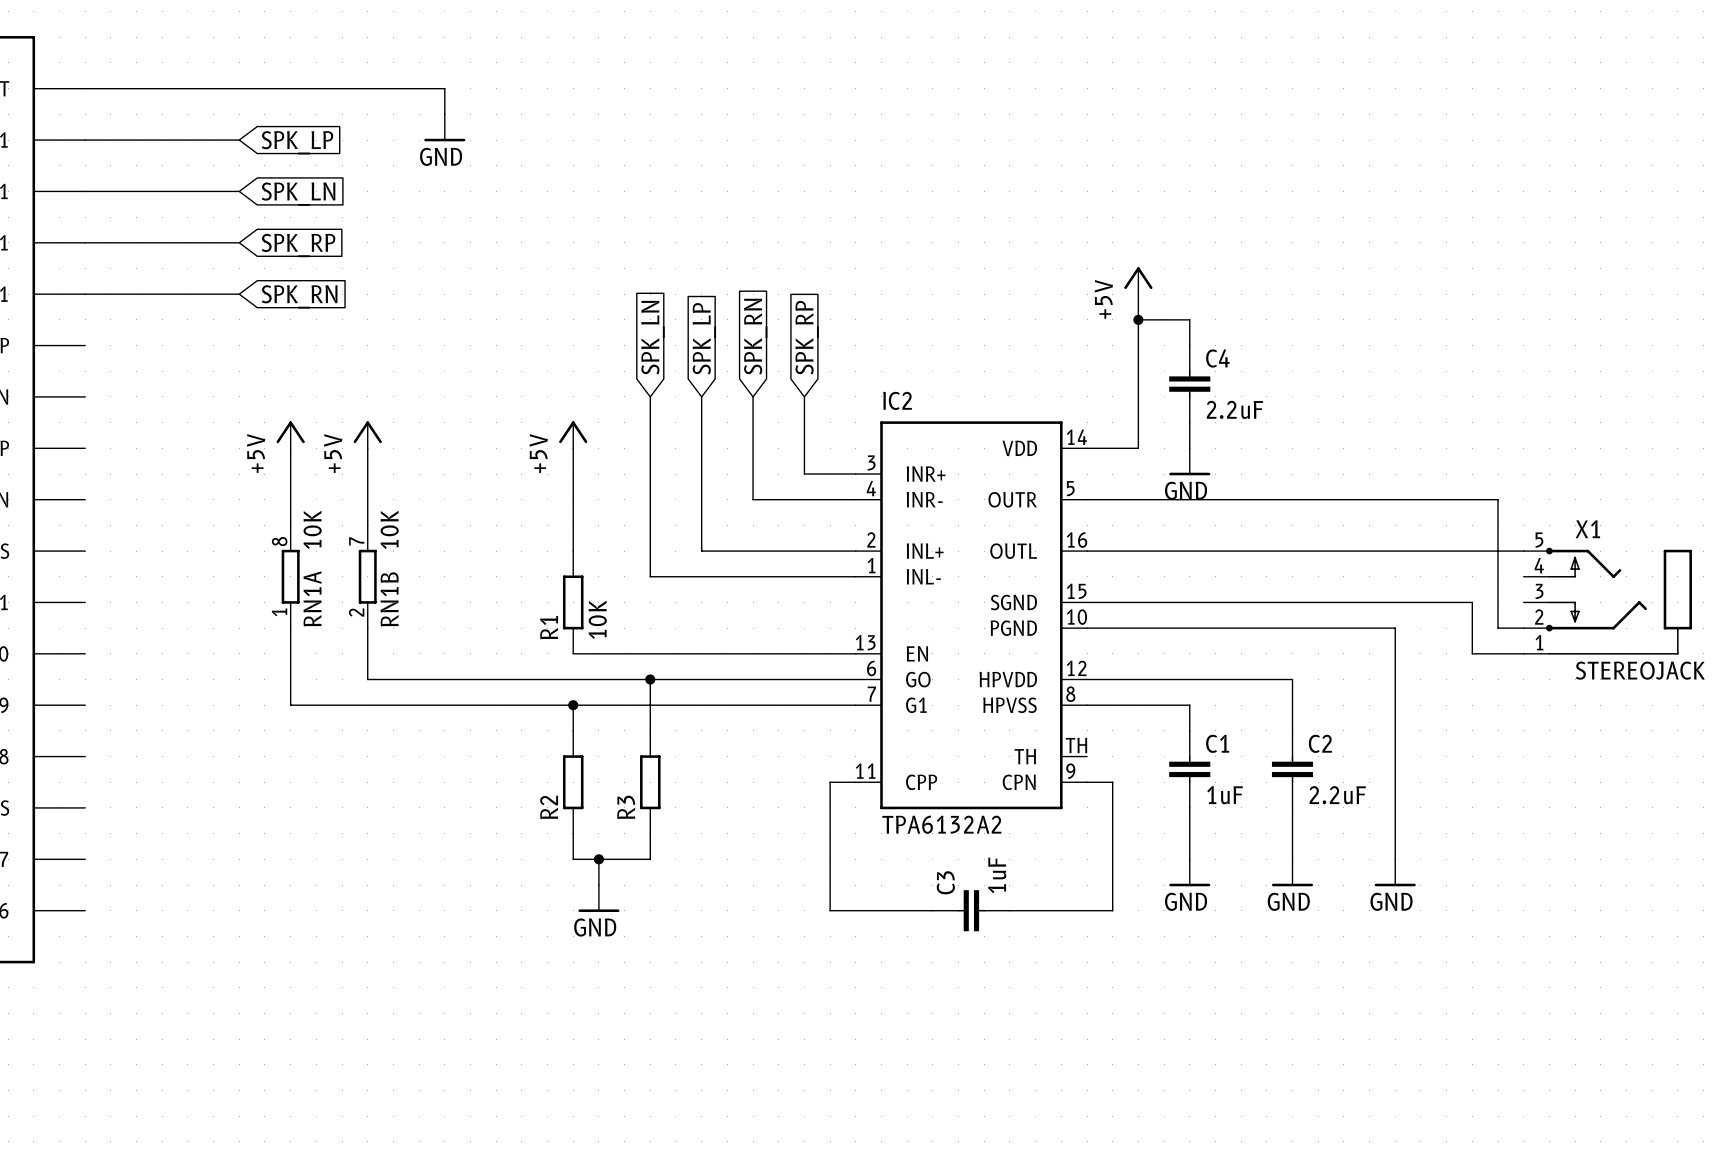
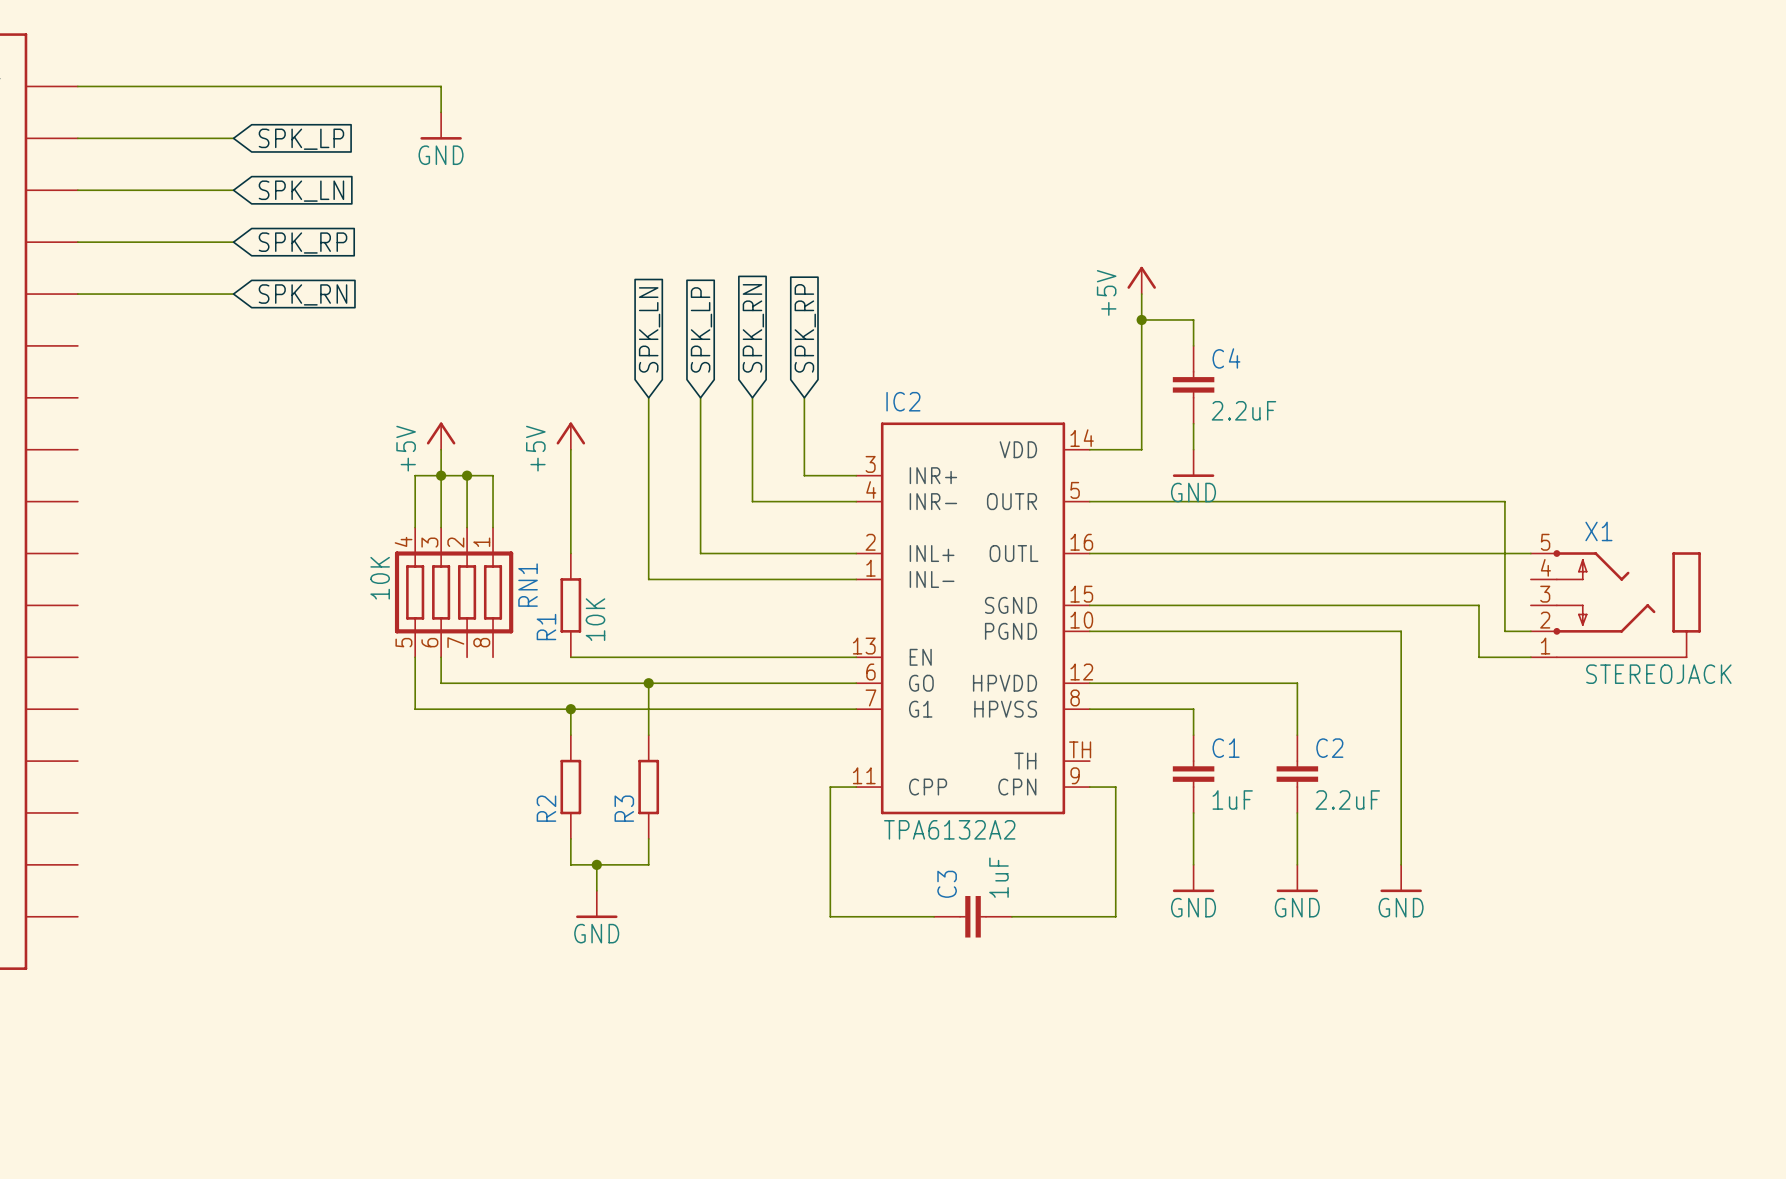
power symbol: +5V (290, 434) -> none
power symbol: +5V (367, 434) -> none
power symbol: none -> +5V (441, 436)
wire: (290, 448) (290, 525) -> none
wire: (367, 448) (367, 525) -> (441, 449) (441, 527)
junction: none -> (441, 475)
wire: none -> (467, 475) (467, 527)
junction: none -> (467, 475)
wire: none -> (415, 527) (415, 475) (493, 475) (493, 527)
RN1A: 10K (290, 576) -> none
RN1B: 10K (367, 576) -> none
RN1: none -> 10K (454, 592)
wire: (290, 628) (290, 705) (419, 705) -> (415, 657) (415, 709)
wire: (367, 628) (367, 679) (444, 679) -> (441, 657) (441, 683)

